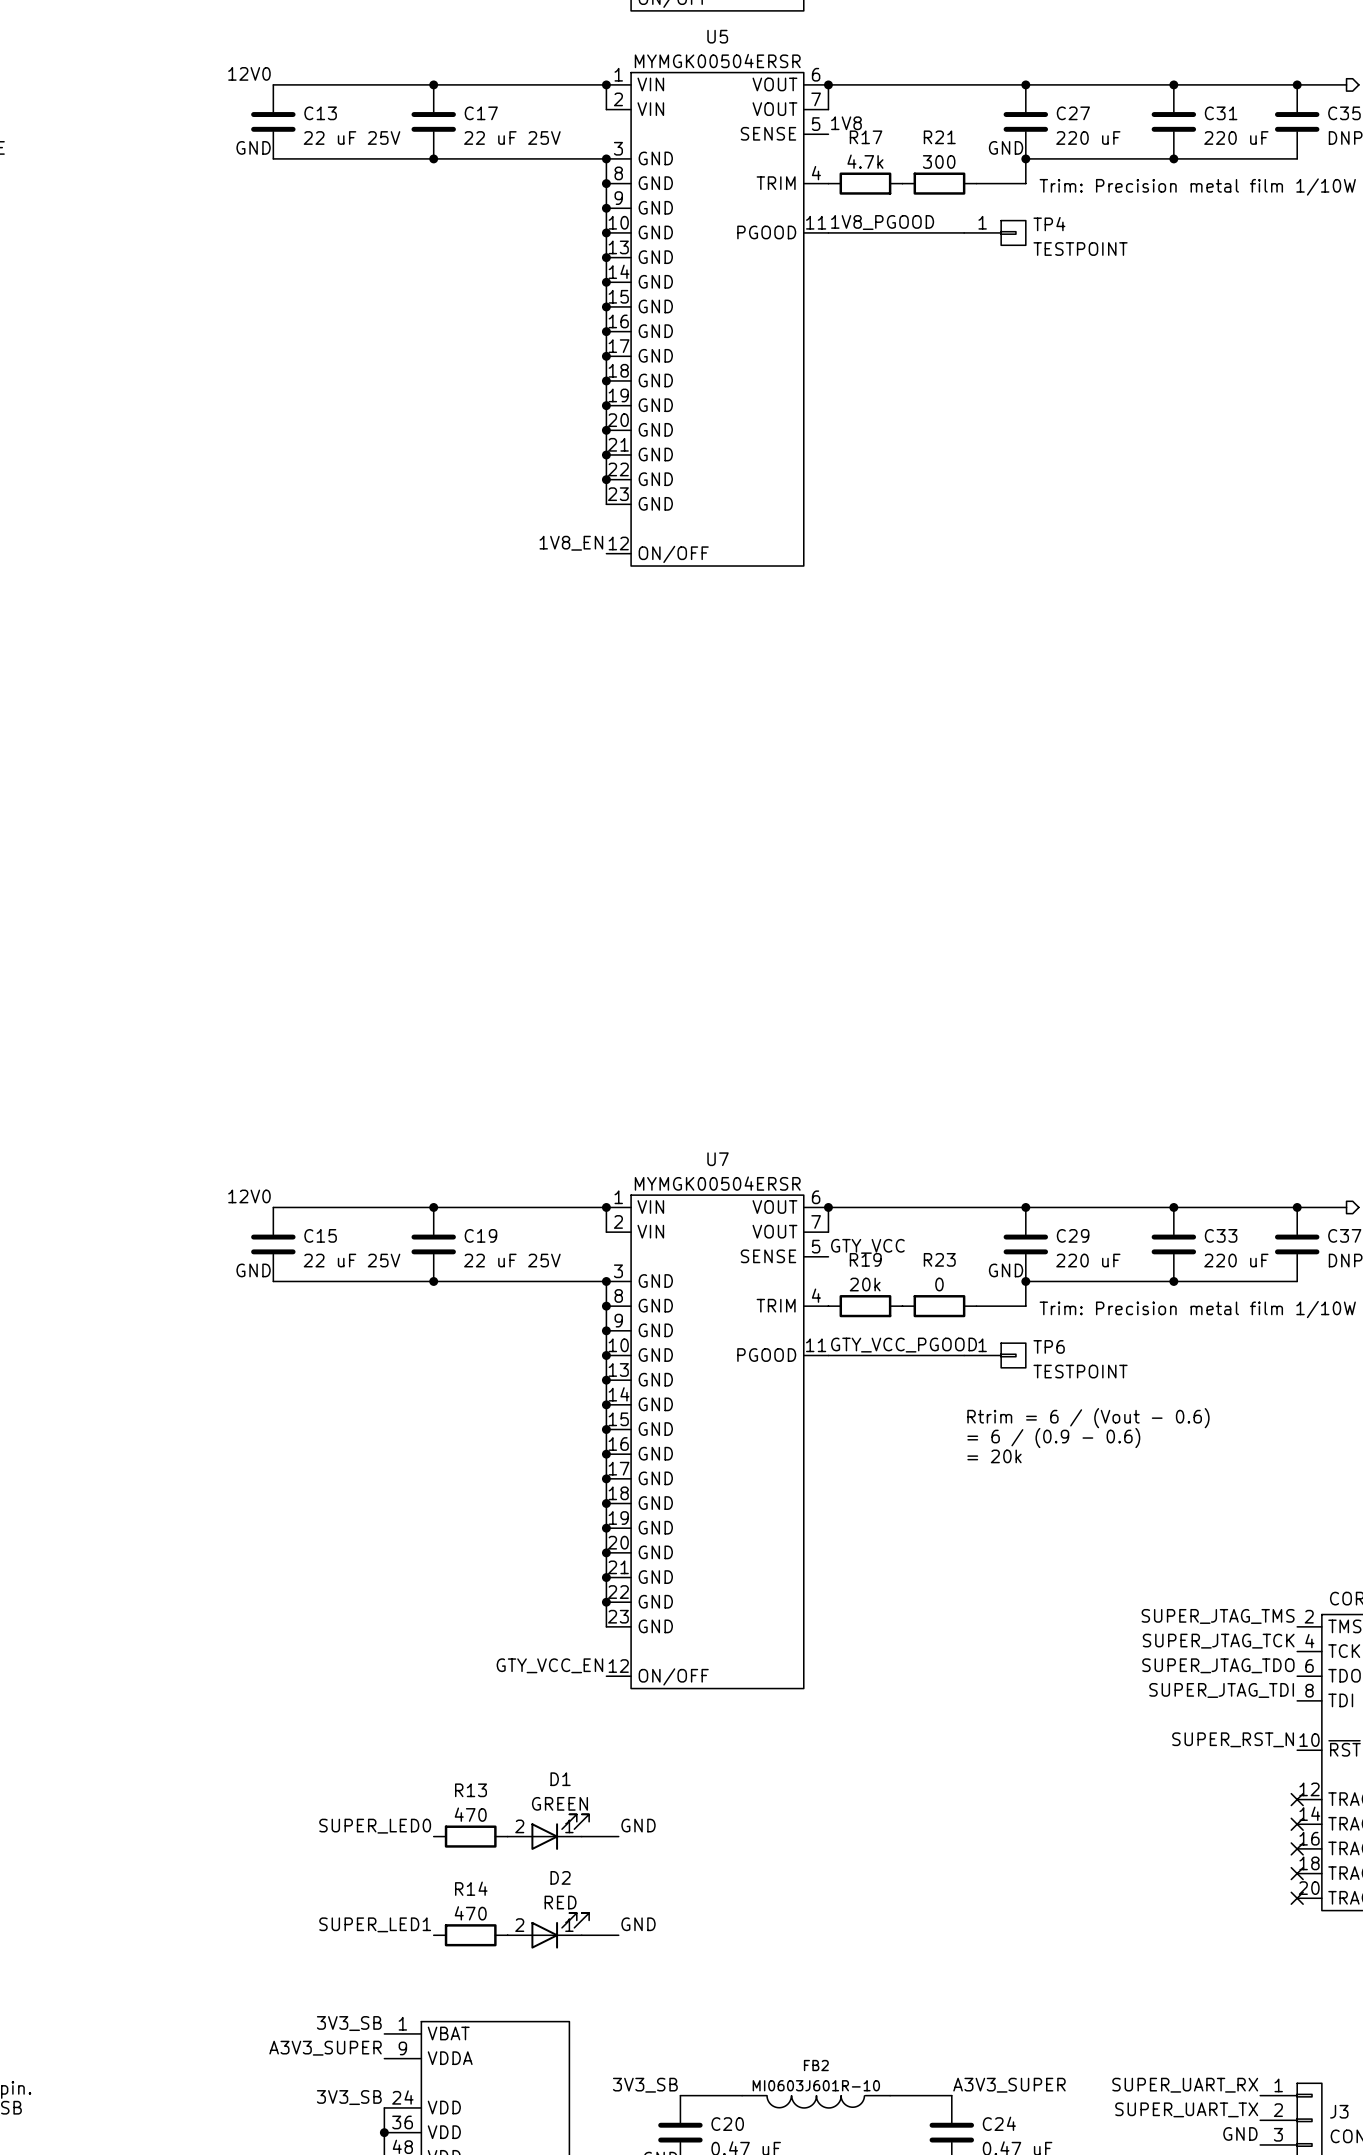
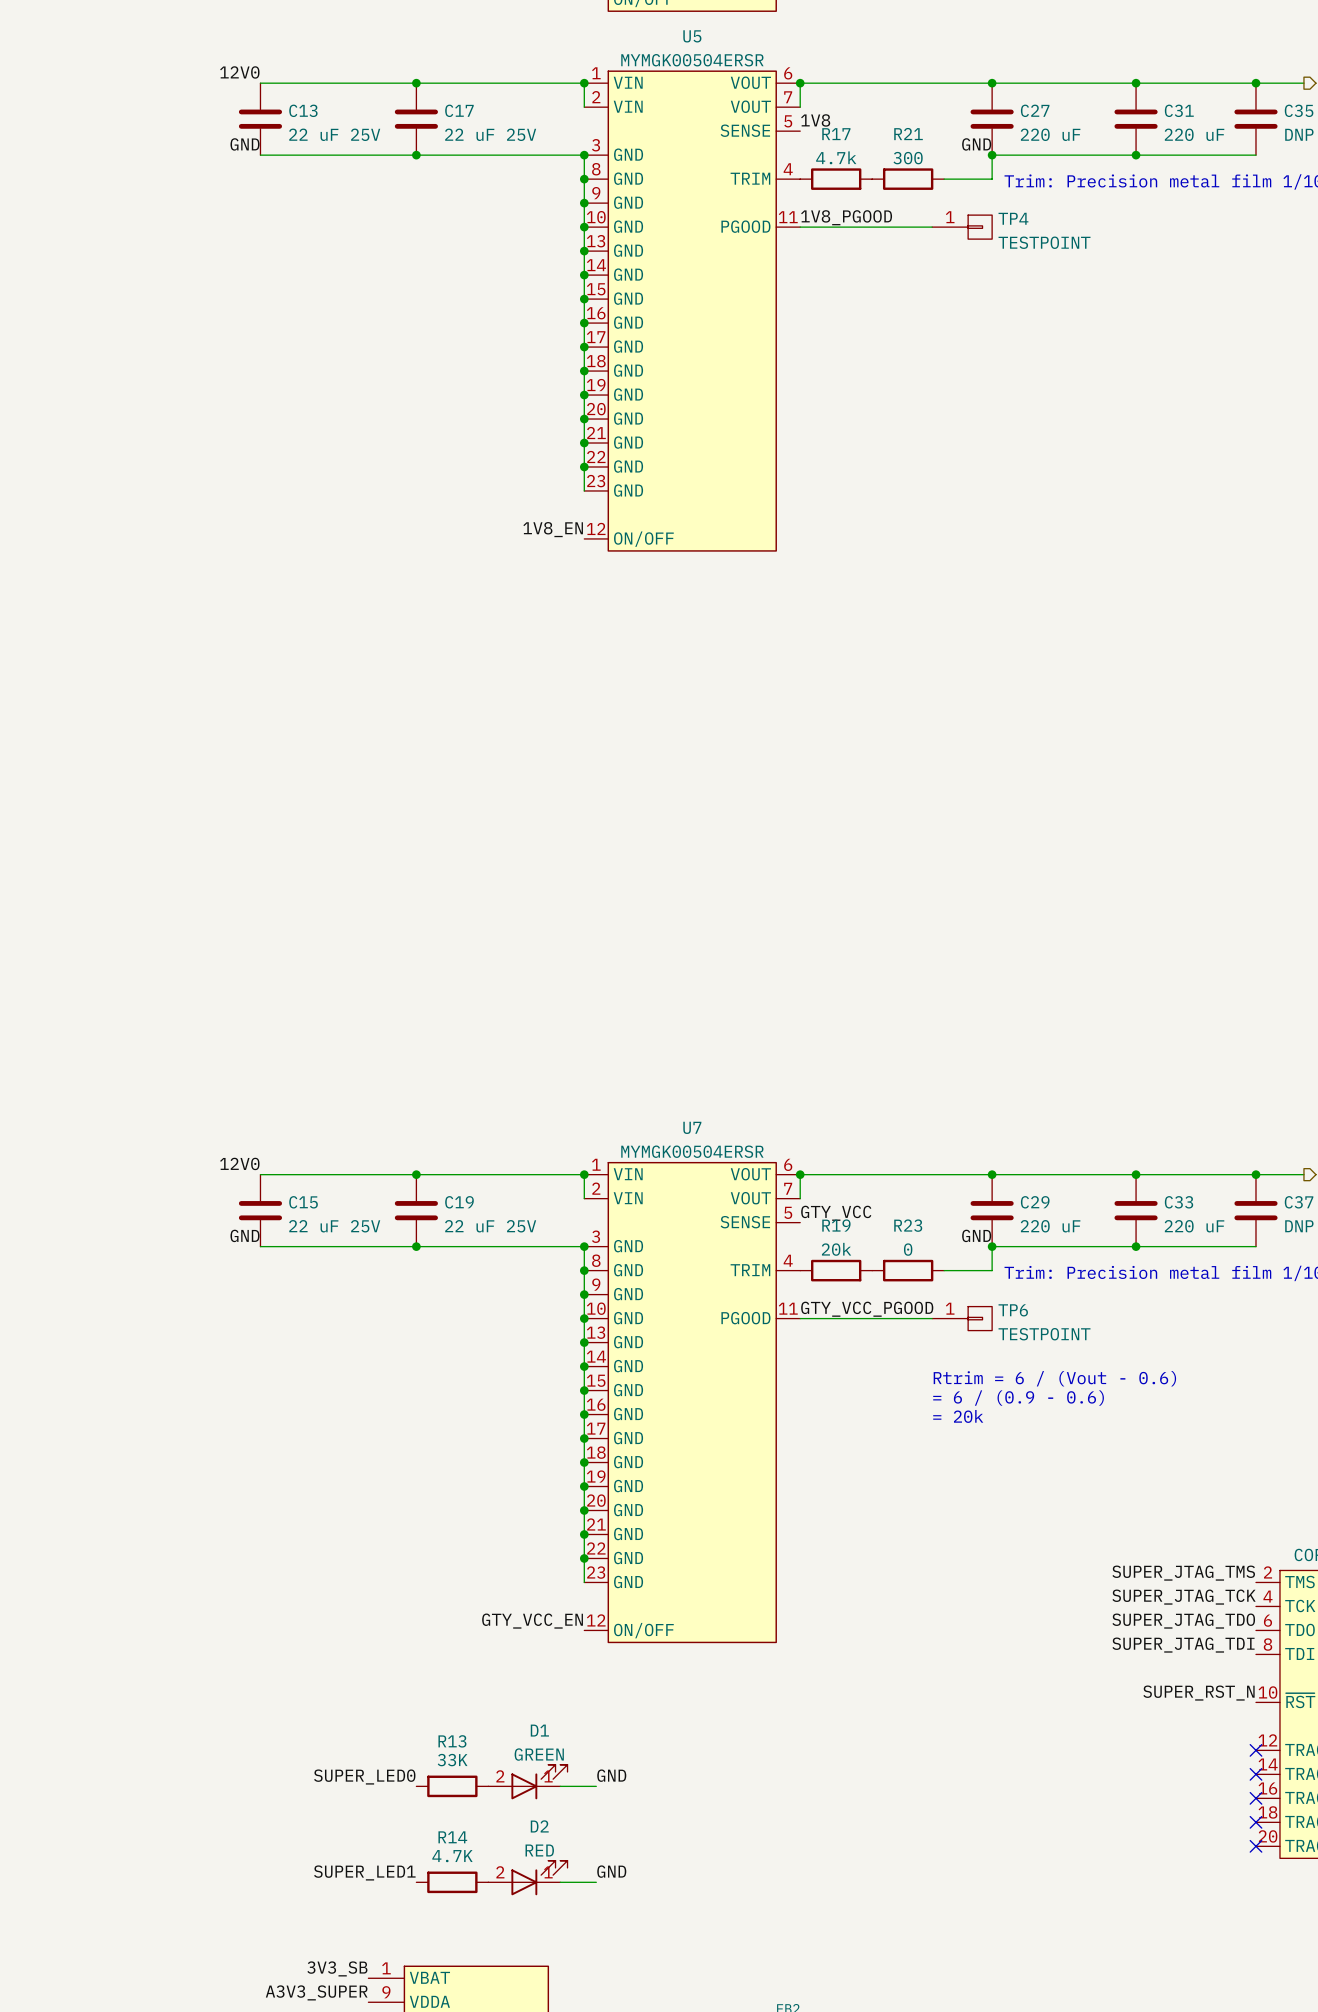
R13 value: 470 (470, 1814) -> 33K (452, 1760)
R14 value: 470 (470, 1913) -> 4.7K (452, 1856)

